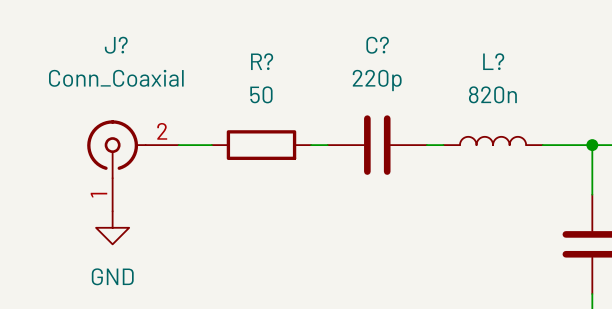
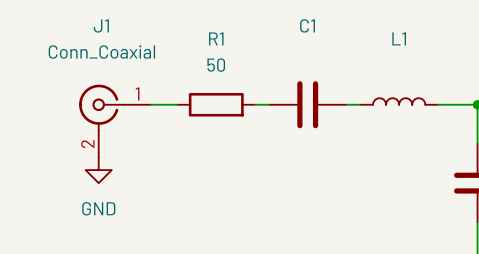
C? name: C? (377, 45) -> C1 (307, 25)
R? name: R? (262, 61) -> R1 (216, 38)
L? name: L? (493, 61) -> L1 (399, 38)
C? value: 220p (377, 80) -> none
L? value: 820n (492, 94) -> none
J?: Conn_Coaxial (132, 165) -> none
J1: none -> Conn_Coaxial (115, 120)

